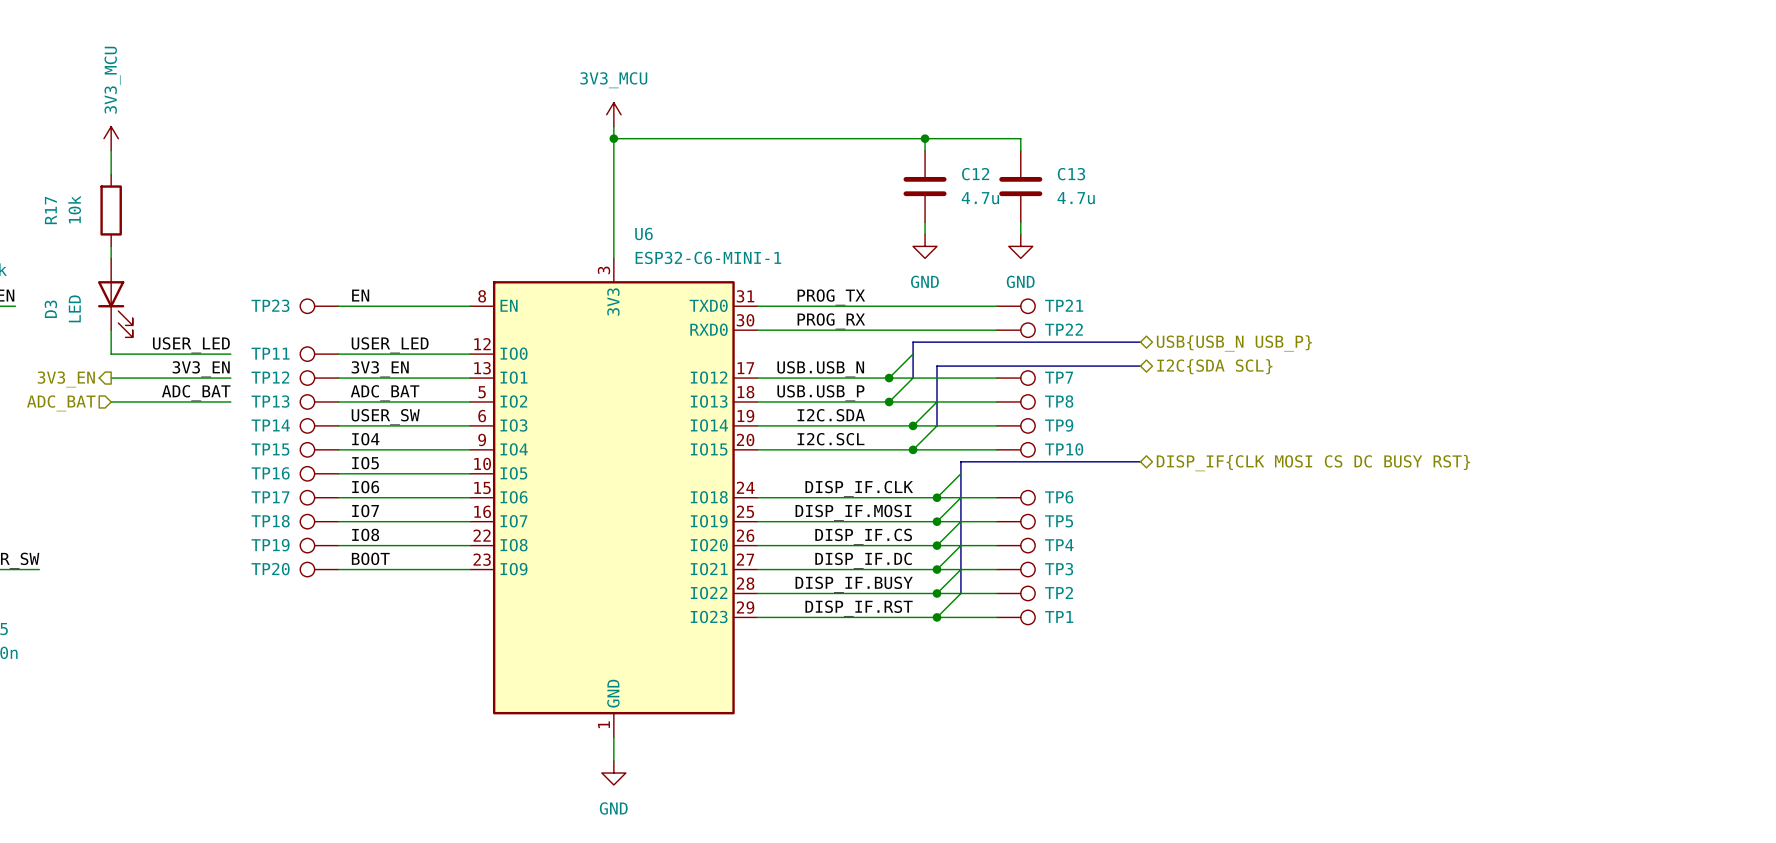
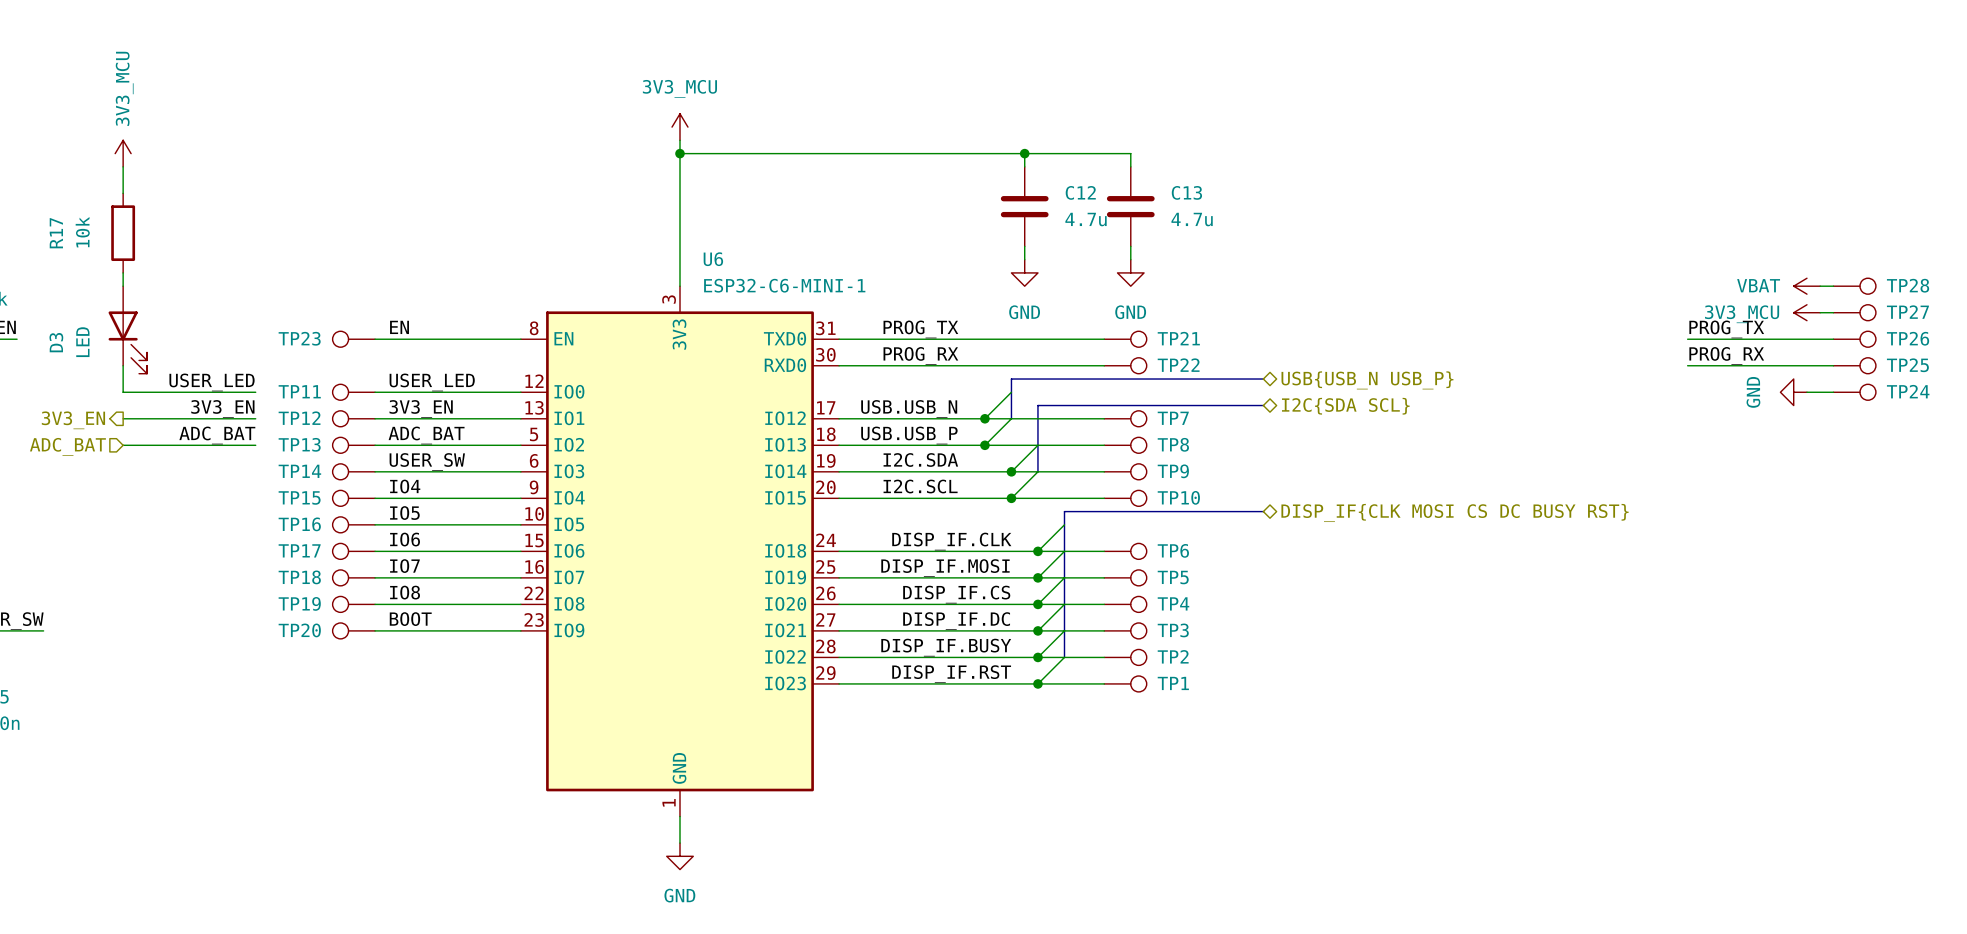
power symbol: none -> VBAT (1806, 286)
wire: none -> (1820, 286) (1833, 286)
TP28: none -> (1854, 286)
power symbol: none -> 3V3_MCU (1806, 312)
wire: none -> (1820, 312) (1833, 312)
TP27: none -> (1854, 312)
label: none -> PROG_TX (1726, 329)
wire: none -> (1687, 339) (1833, 339)
TP26: none -> (1854, 339)
label: none -> PROG_RX (1726, 355)
wire: none -> (1687, 365) (1833, 365)
TP25: none -> (1854, 365)
power symbol: none -> GND (1793, 392)
wire: none -> (1806, 392) (1833, 392)
TP24: none -> (1854, 392)

